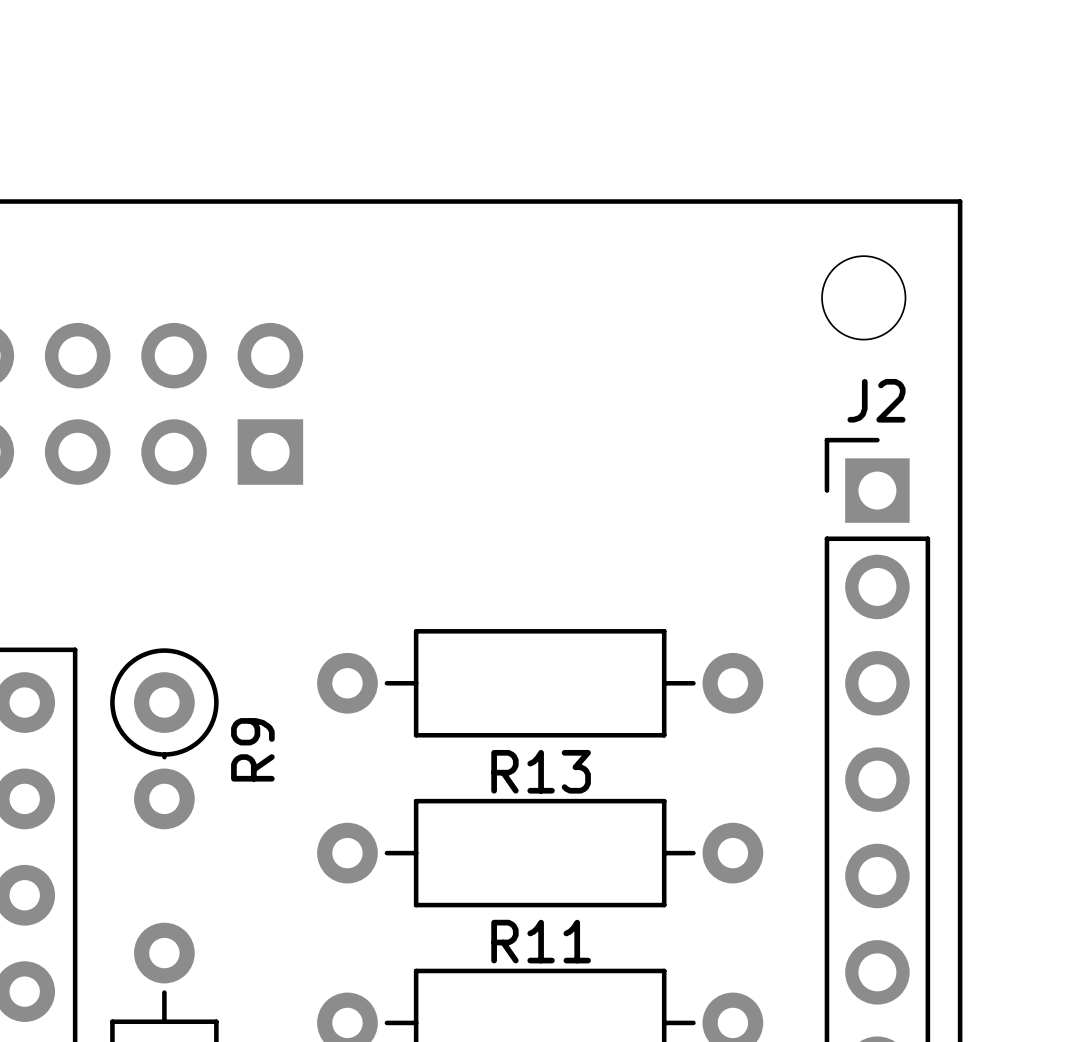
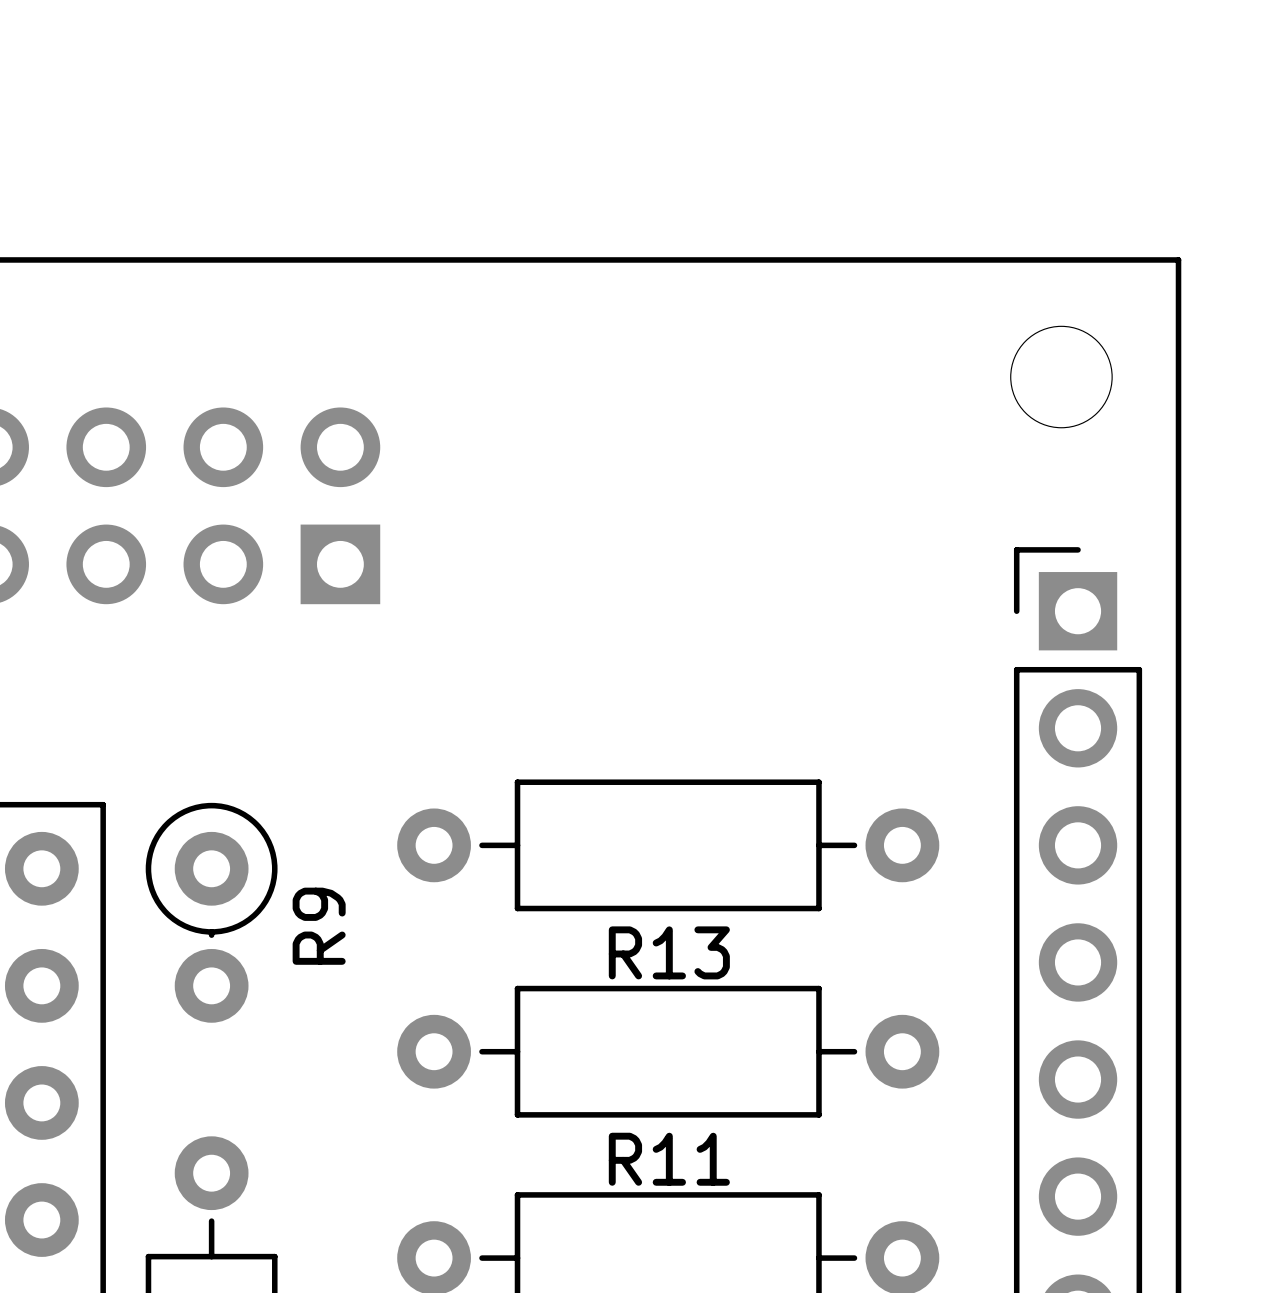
J2 name: J2 (876, 400) -> none

